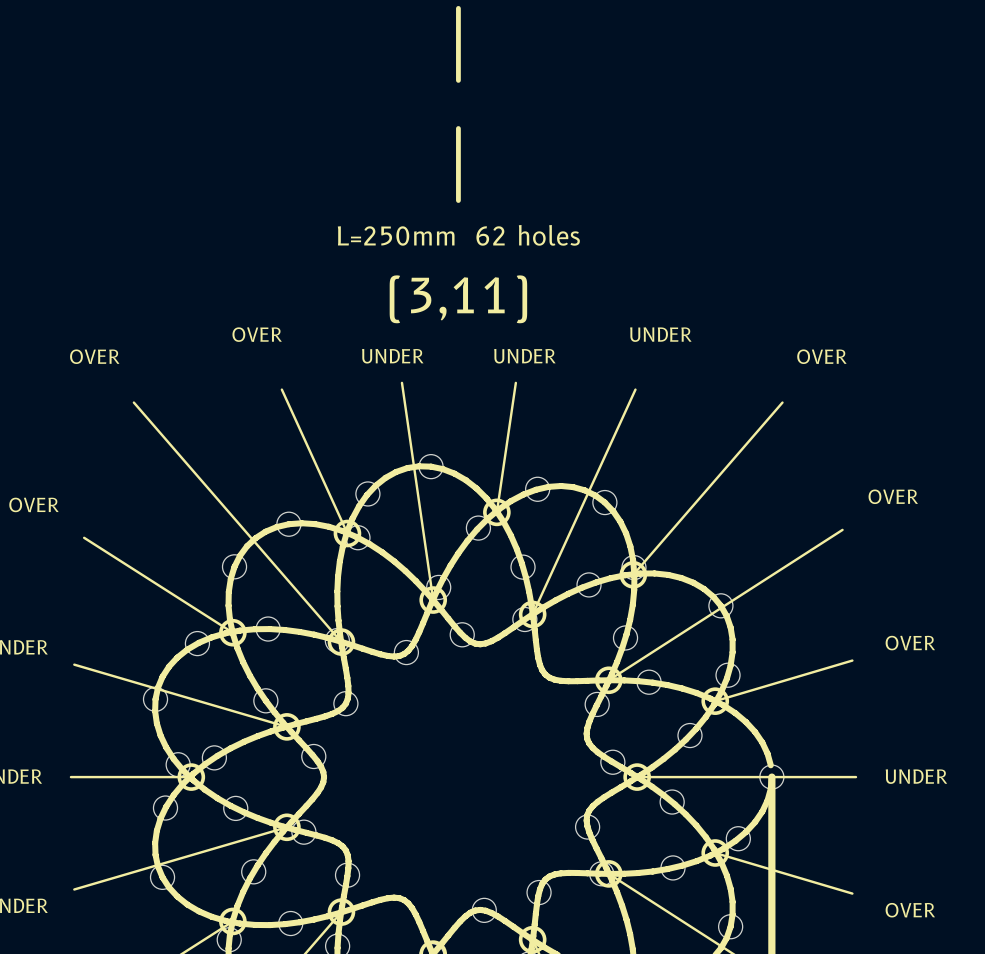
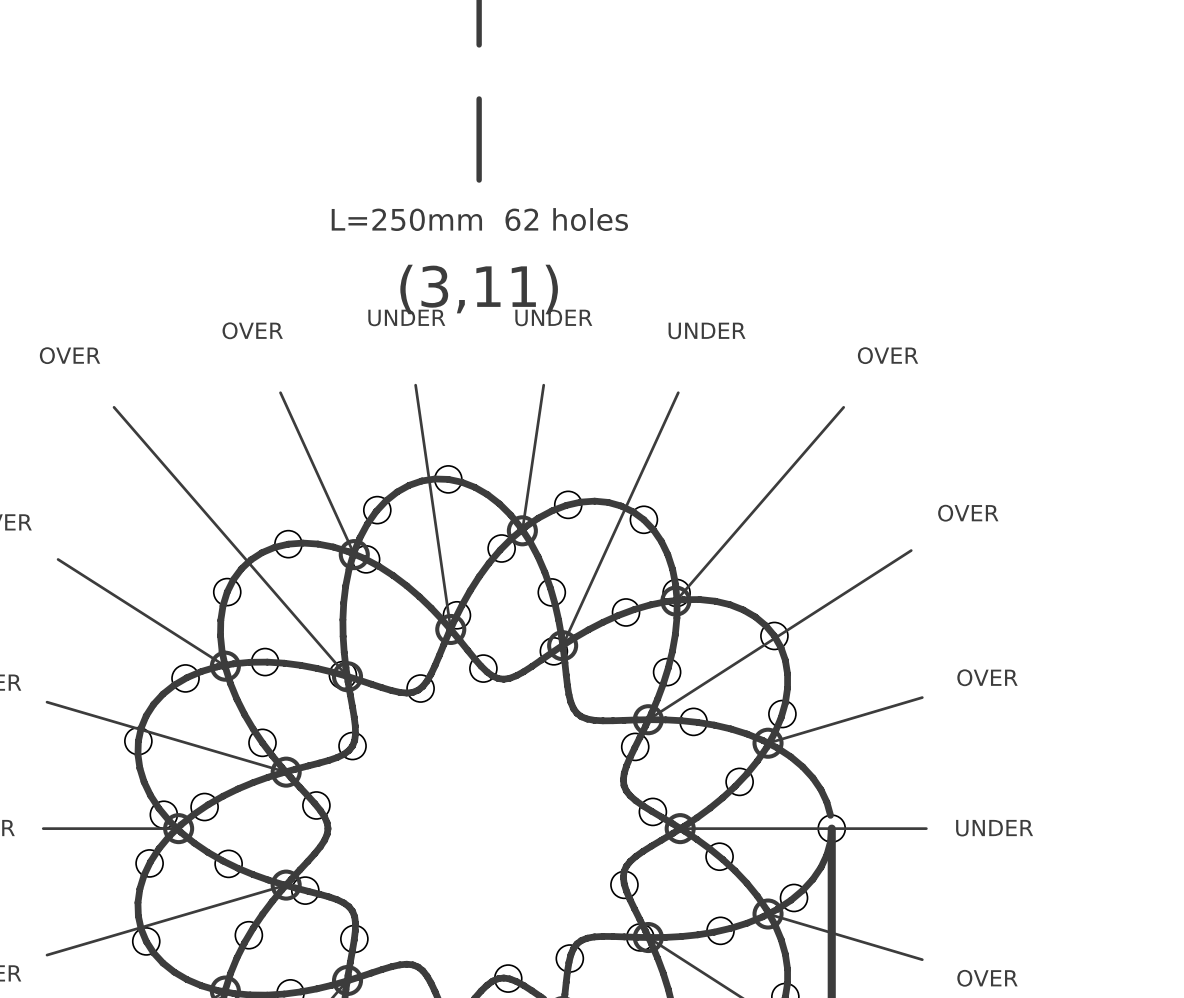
text position: UNDER (392, 356) -> UNDER (406, 317)
text position: UNDER (524, 356) -> UNDER (553, 317)

